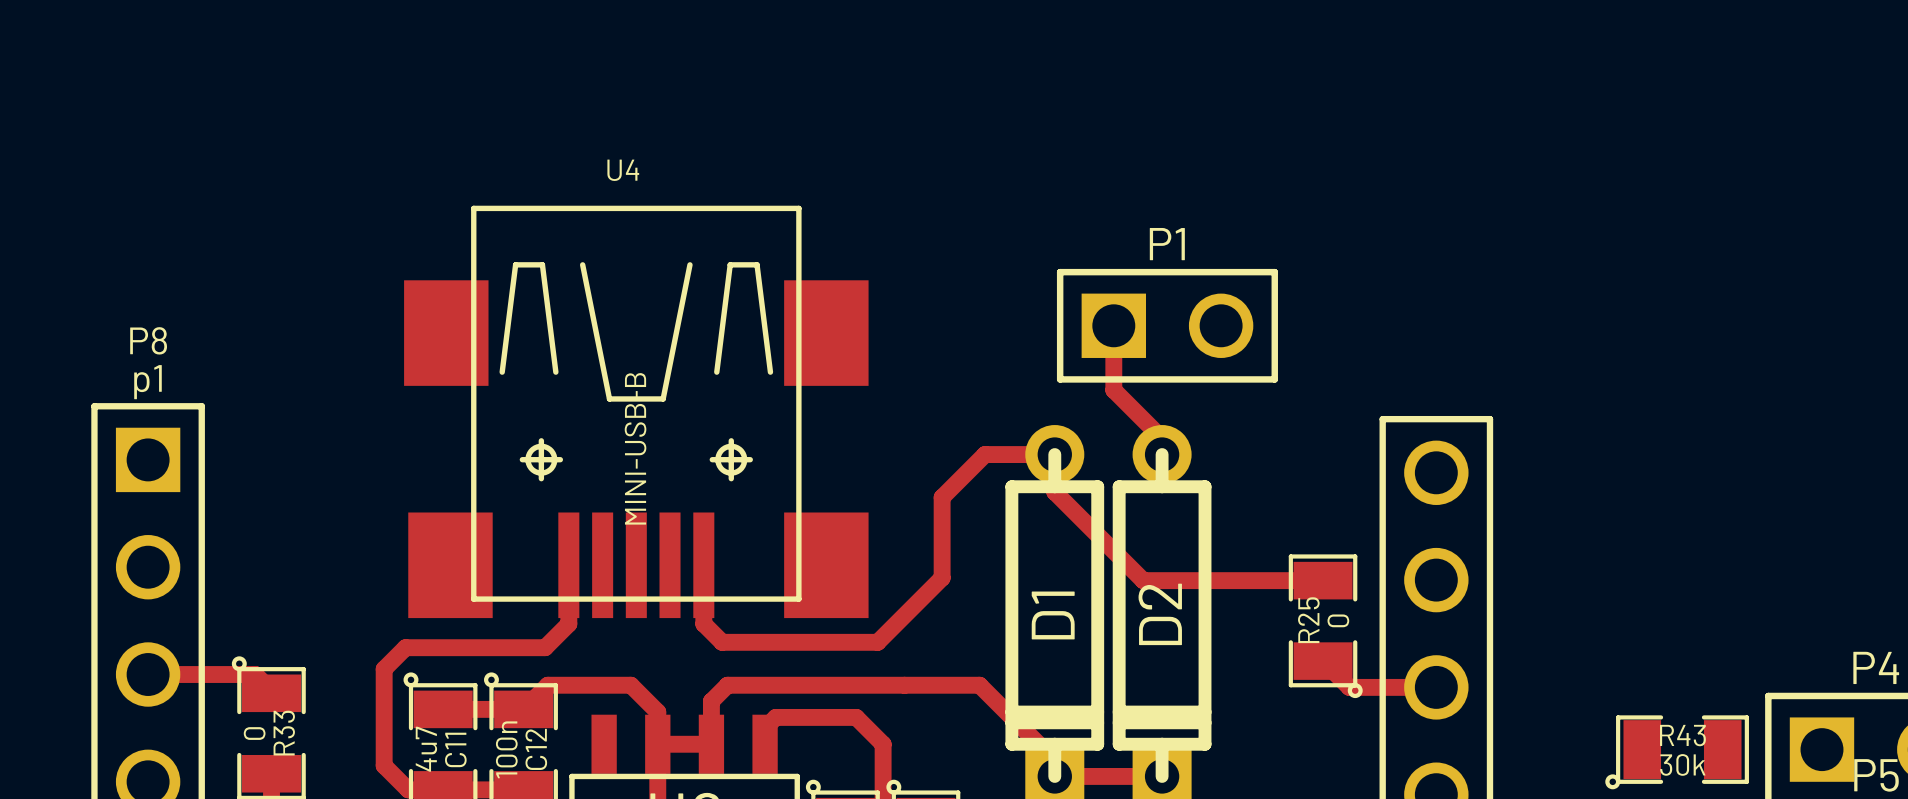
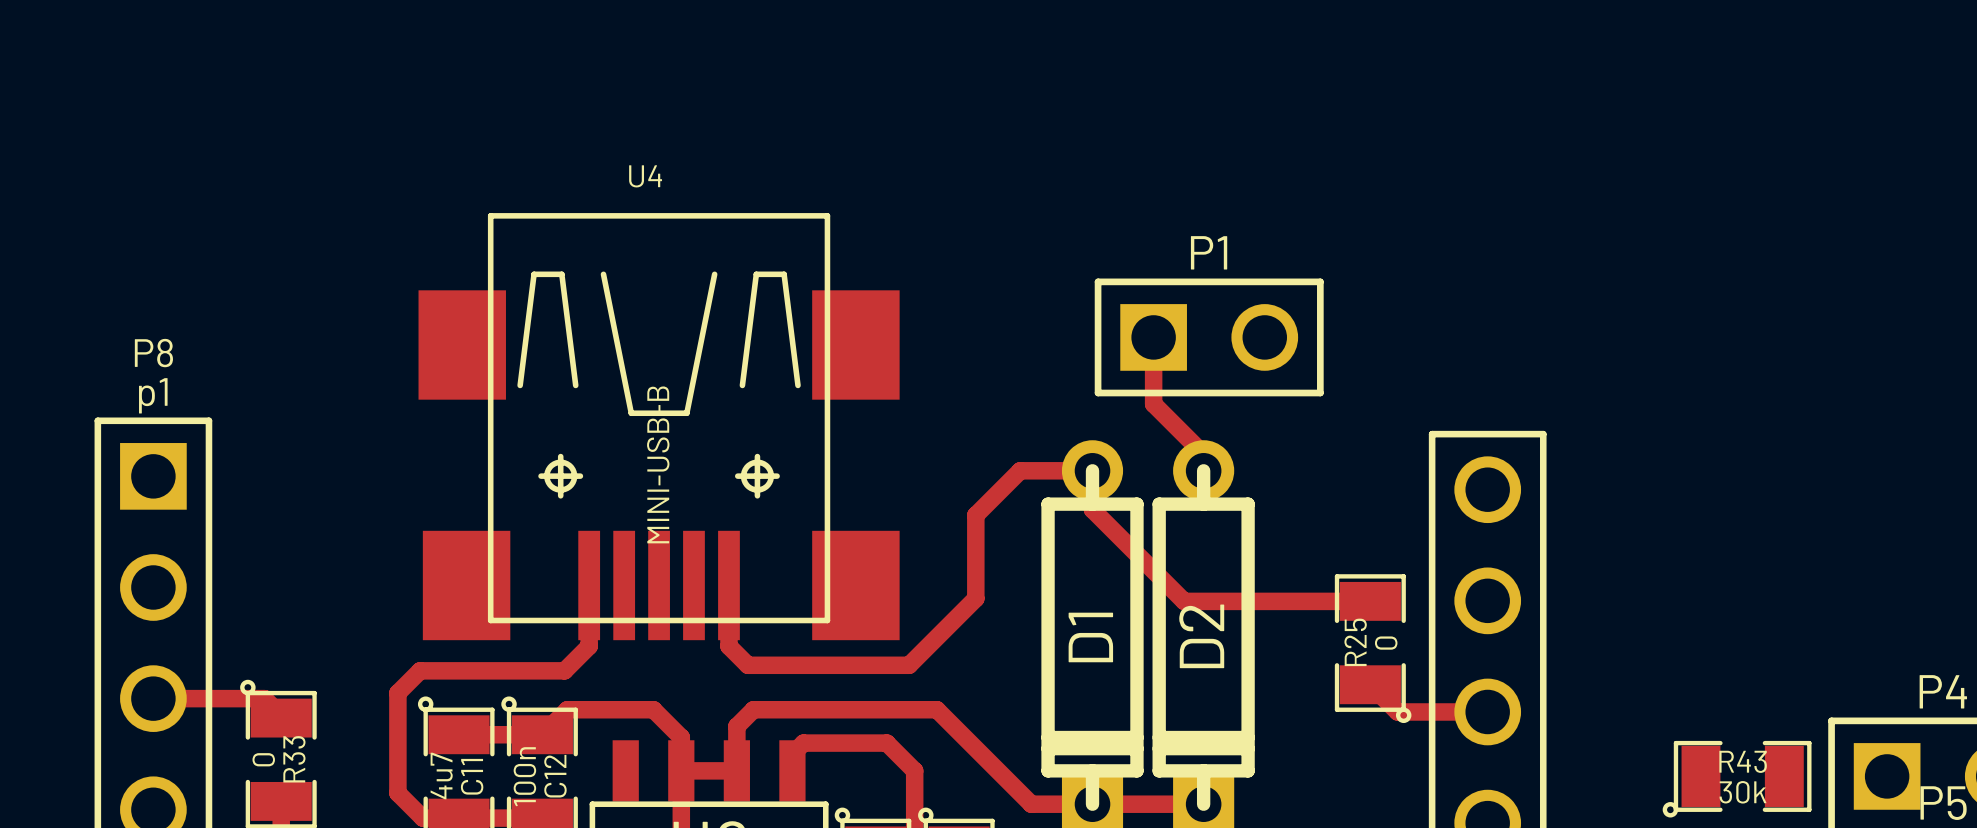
top track: (904, 685) (979, 685) (1054, 760) (1054, 776) -> (936, 709) (1031, 804) (1092, 804)

